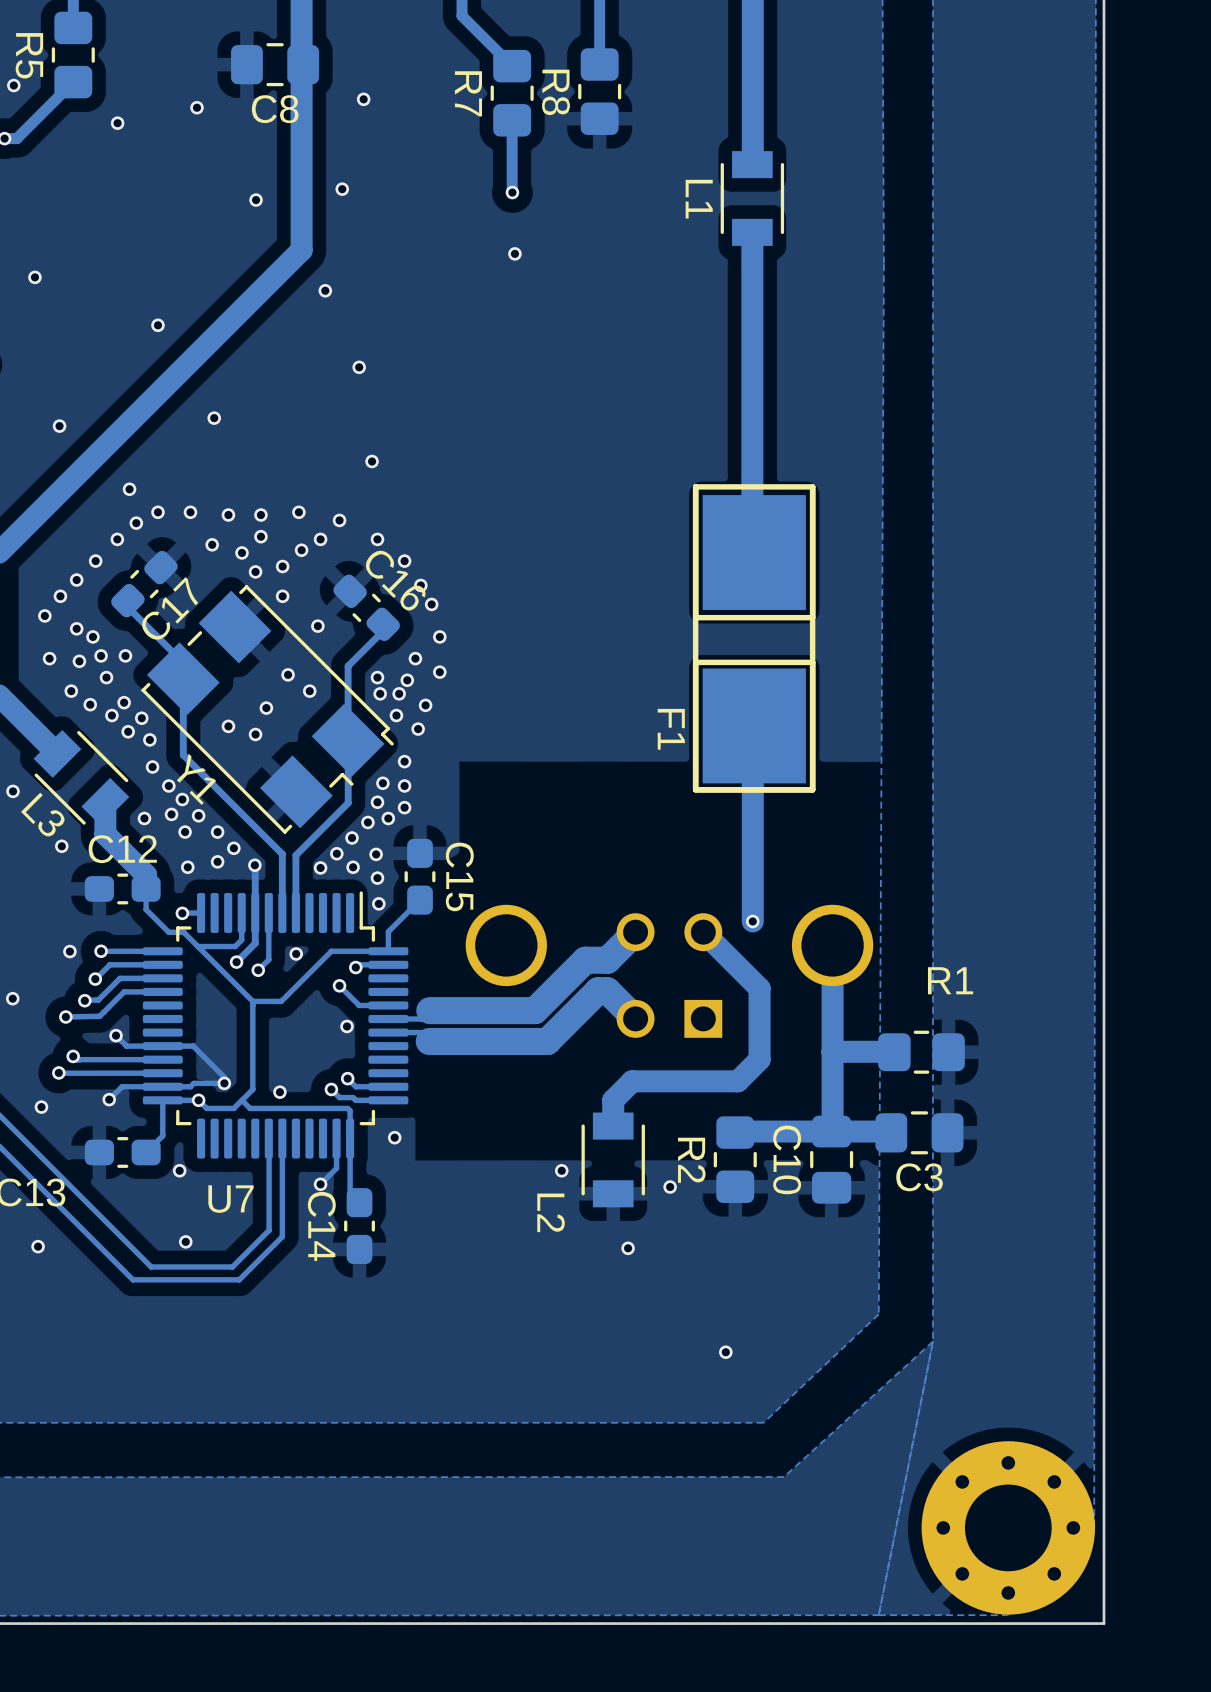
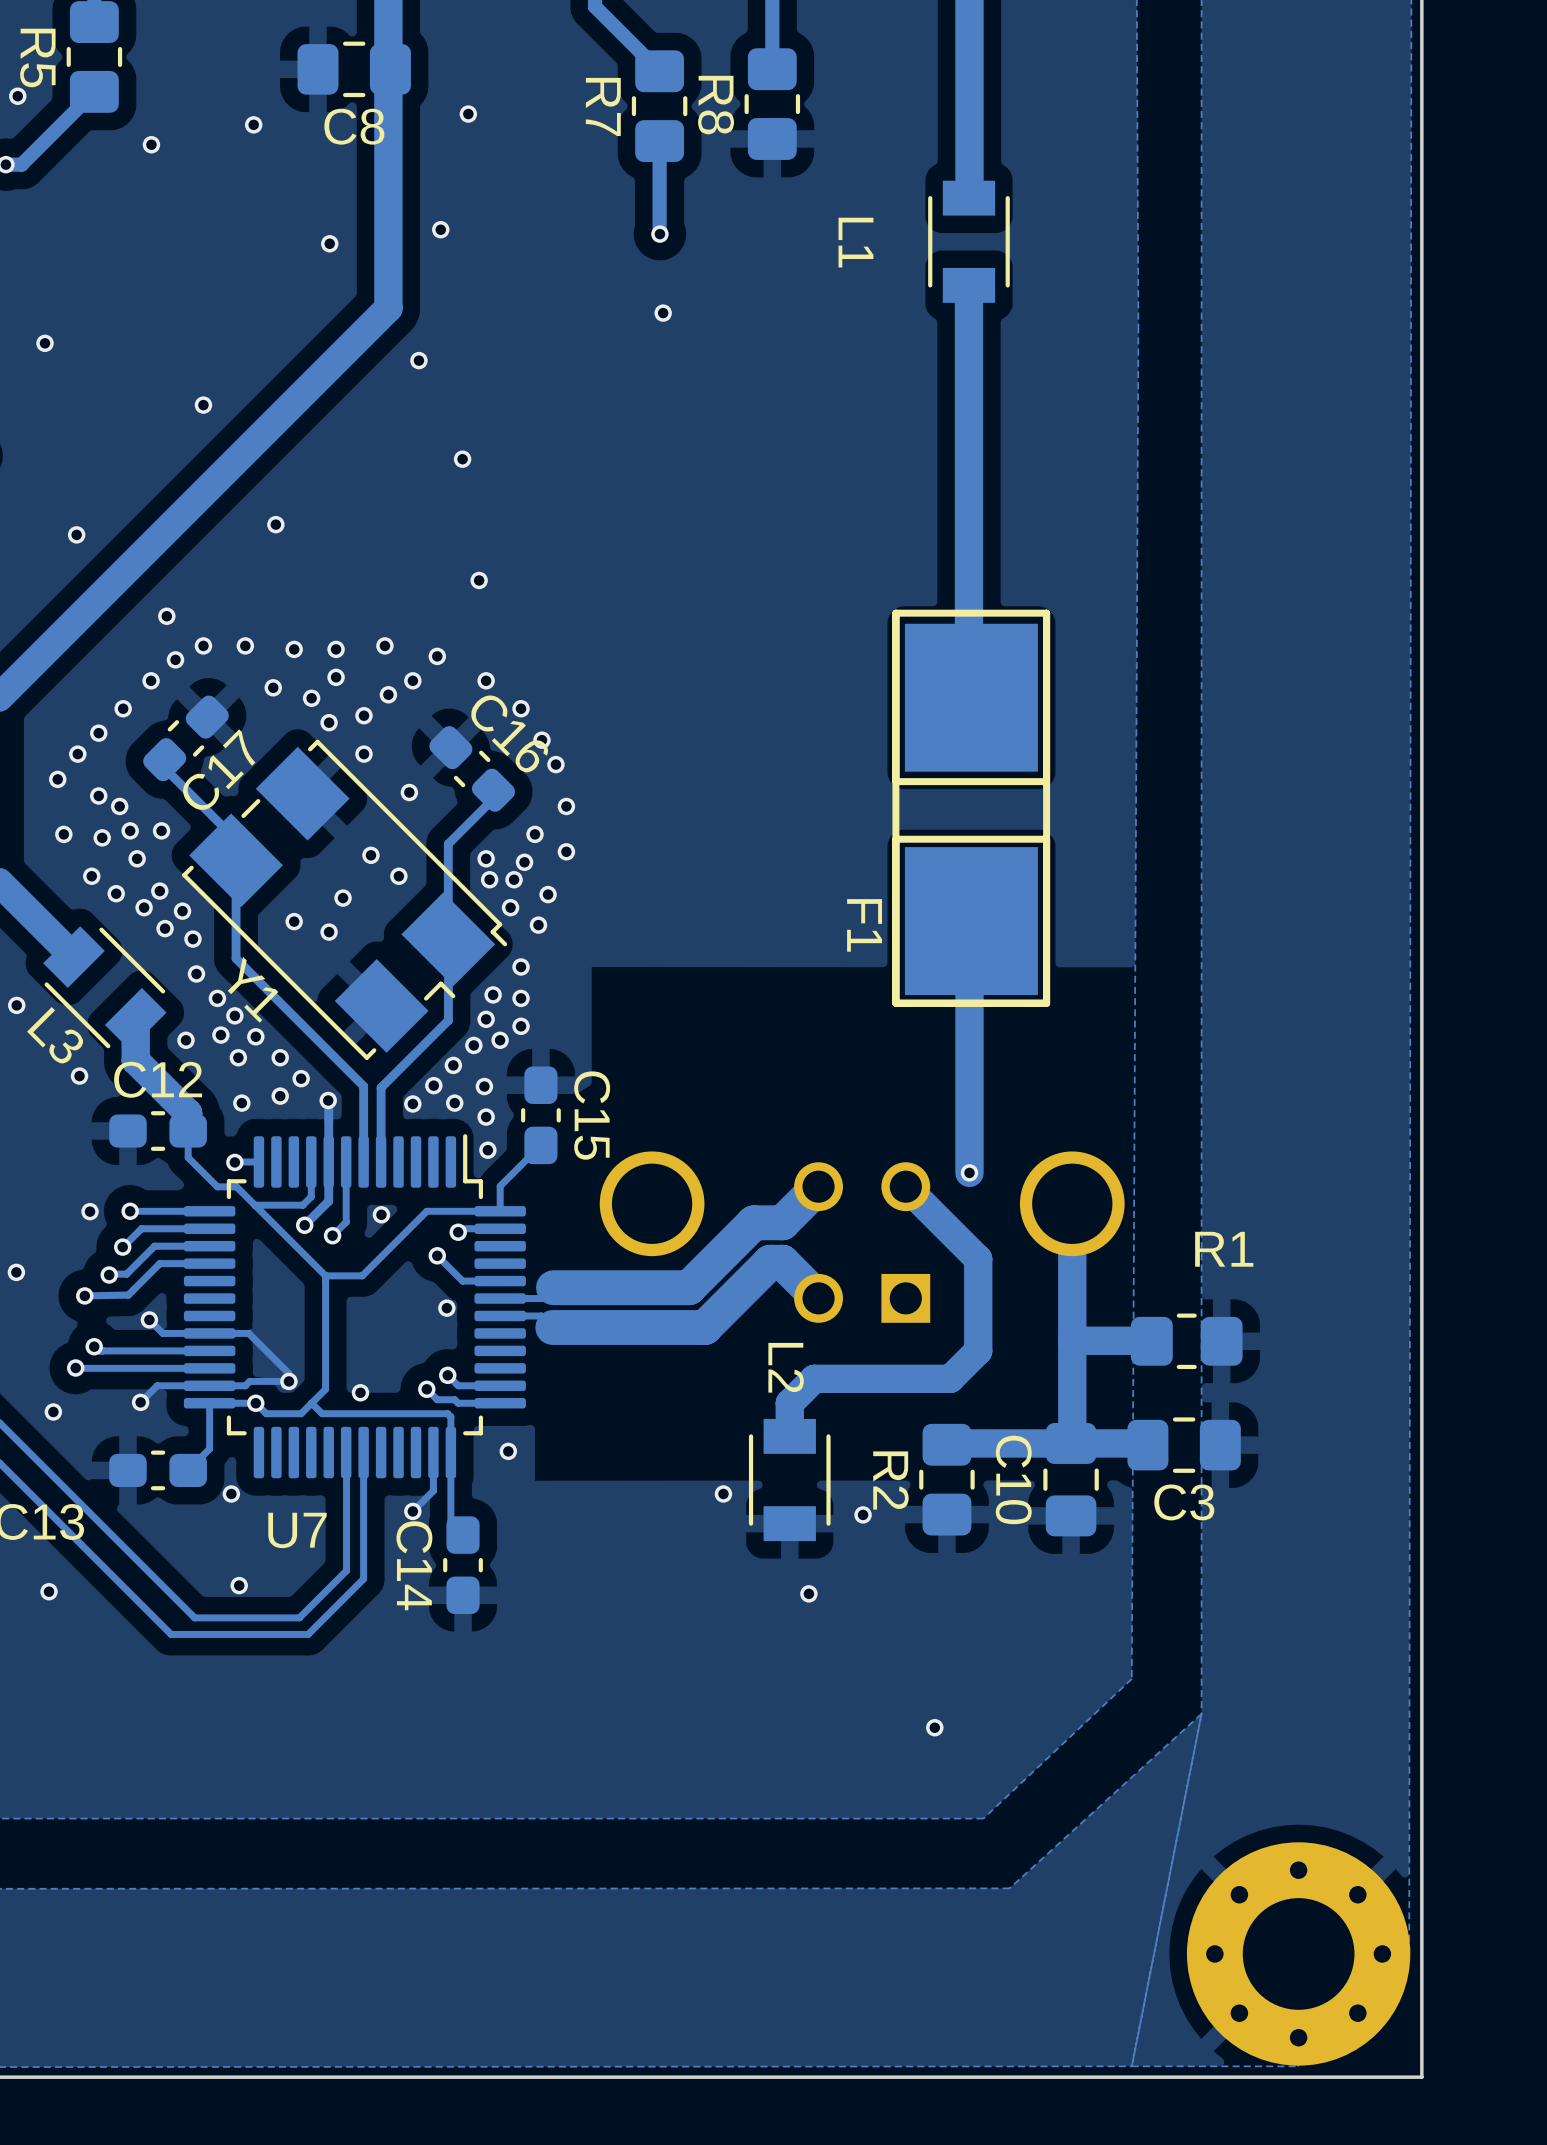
L1 name position: L1 (699, 199) -> L1 (855, 242)
L2 name position: L2 (551, 1212) -> L2 (786, 1367)

